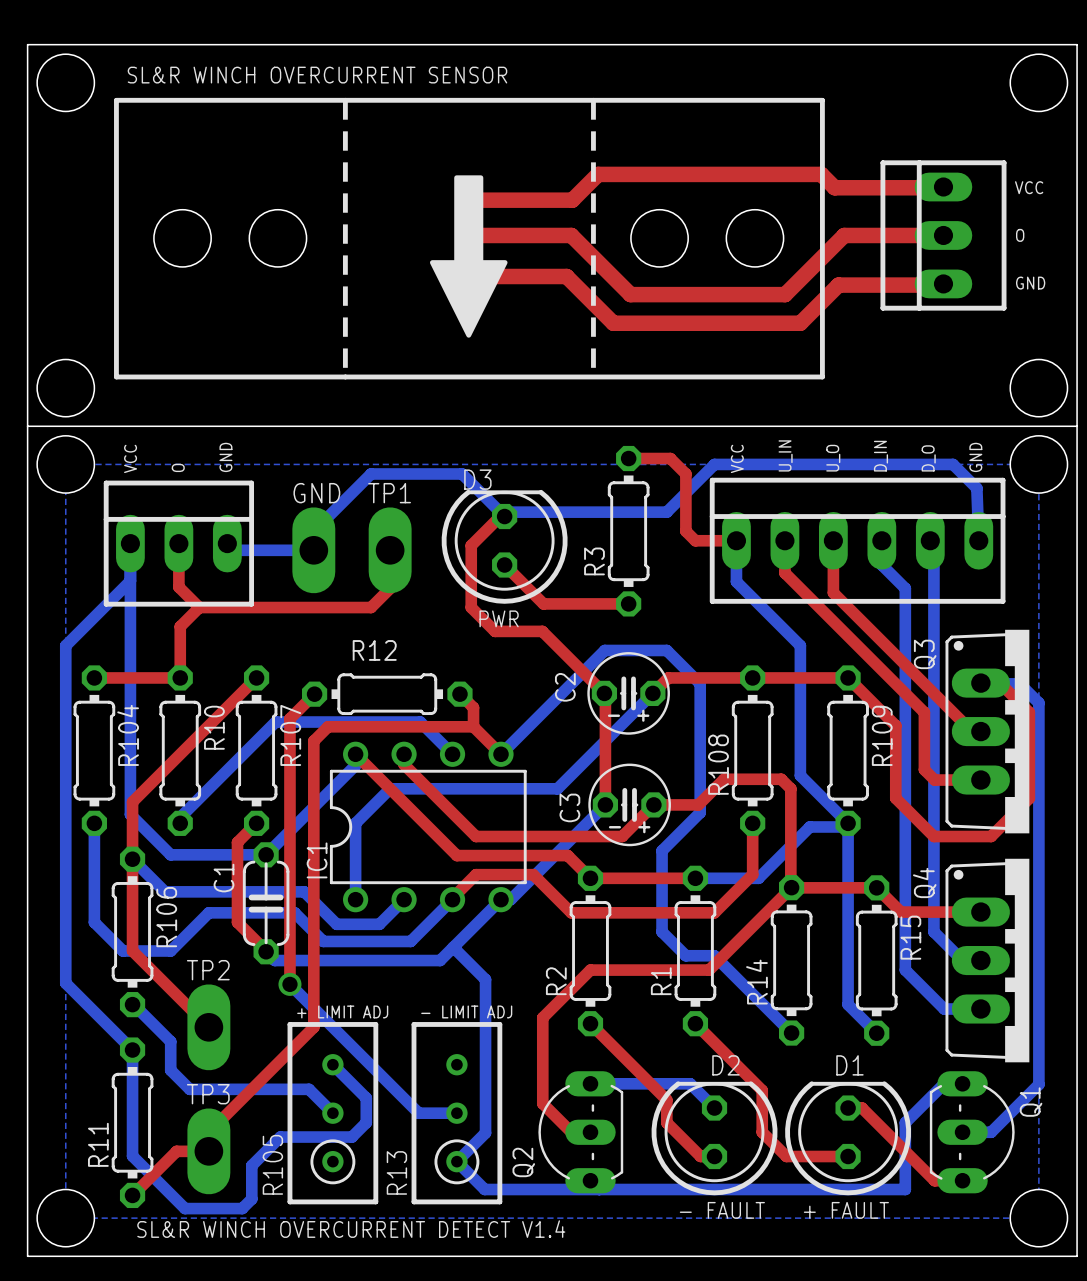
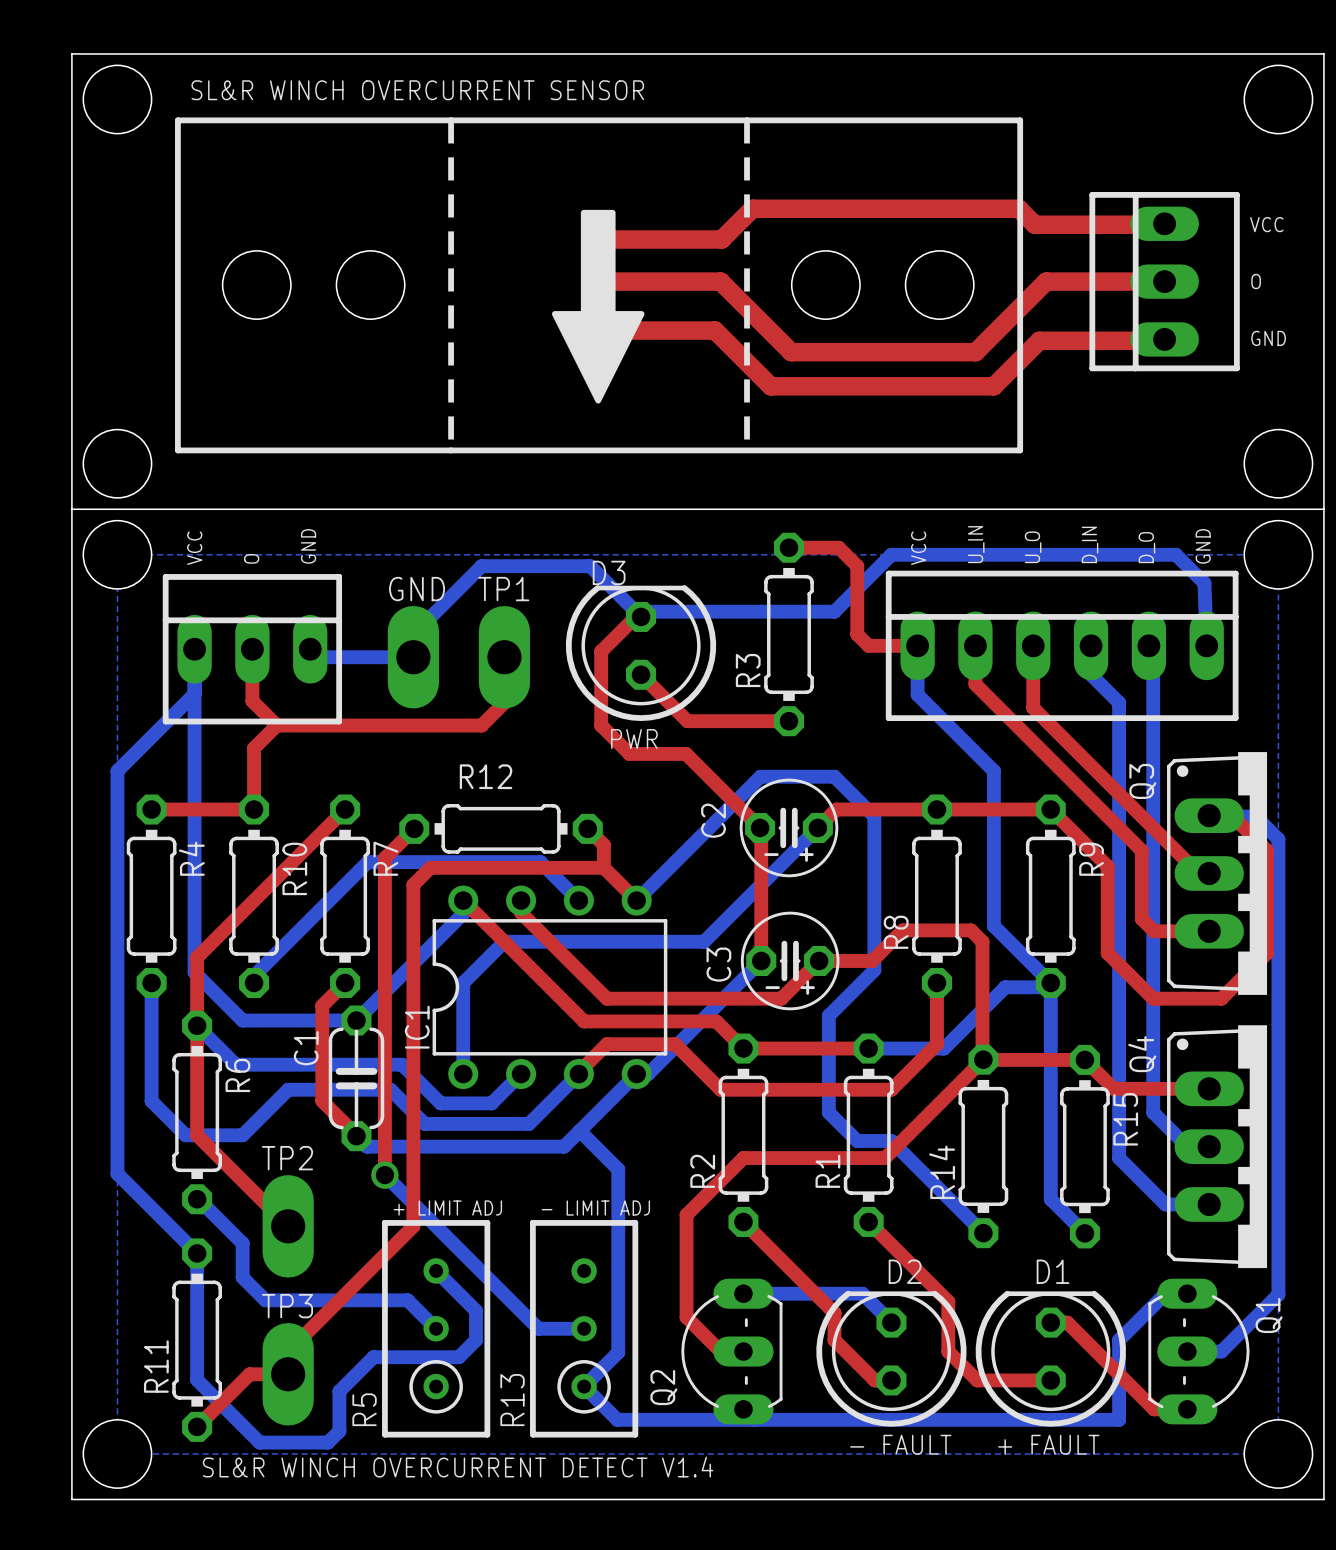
R104 name: R104 (128, 735) -> R4 (191, 858)
R107 name: R107 (290, 735) -> R7 (385, 858)
R109 name: R109 (882, 735) -> R9 (1091, 859)
R108 name: R108 (718, 764) -> R8 (896, 932)
R106 name: R106 (166, 917) -> R6 (237, 1075)
R105 name: R105 (272, 1164) -> R5 (364, 1409)

